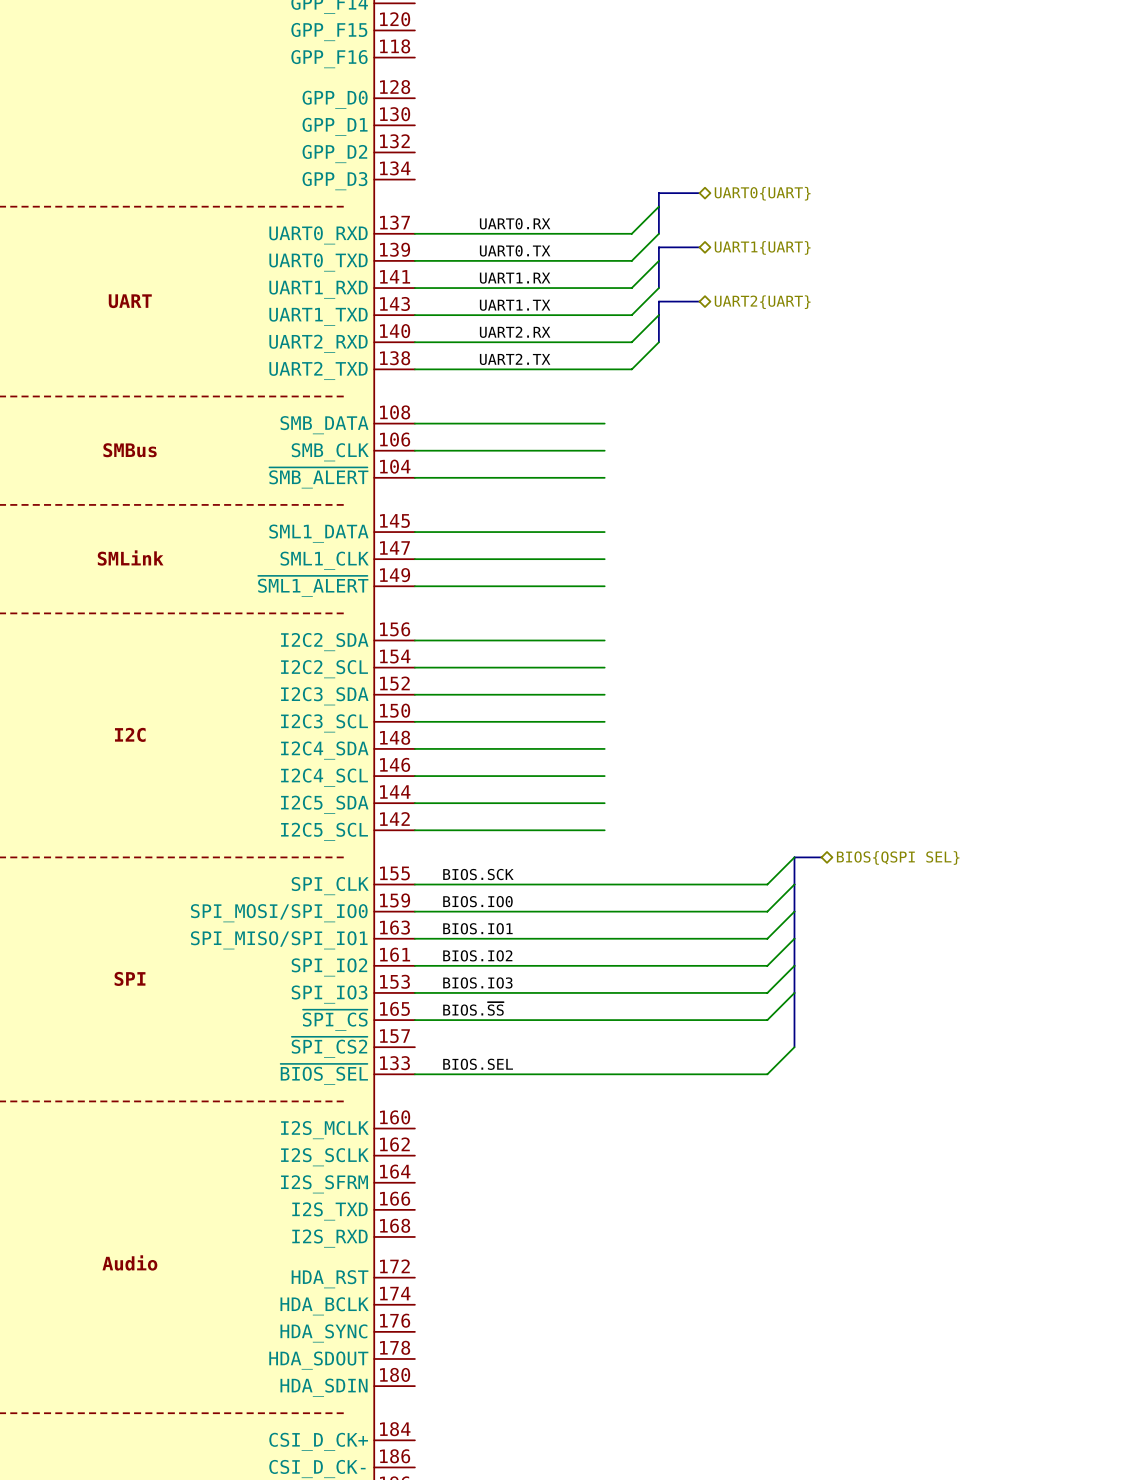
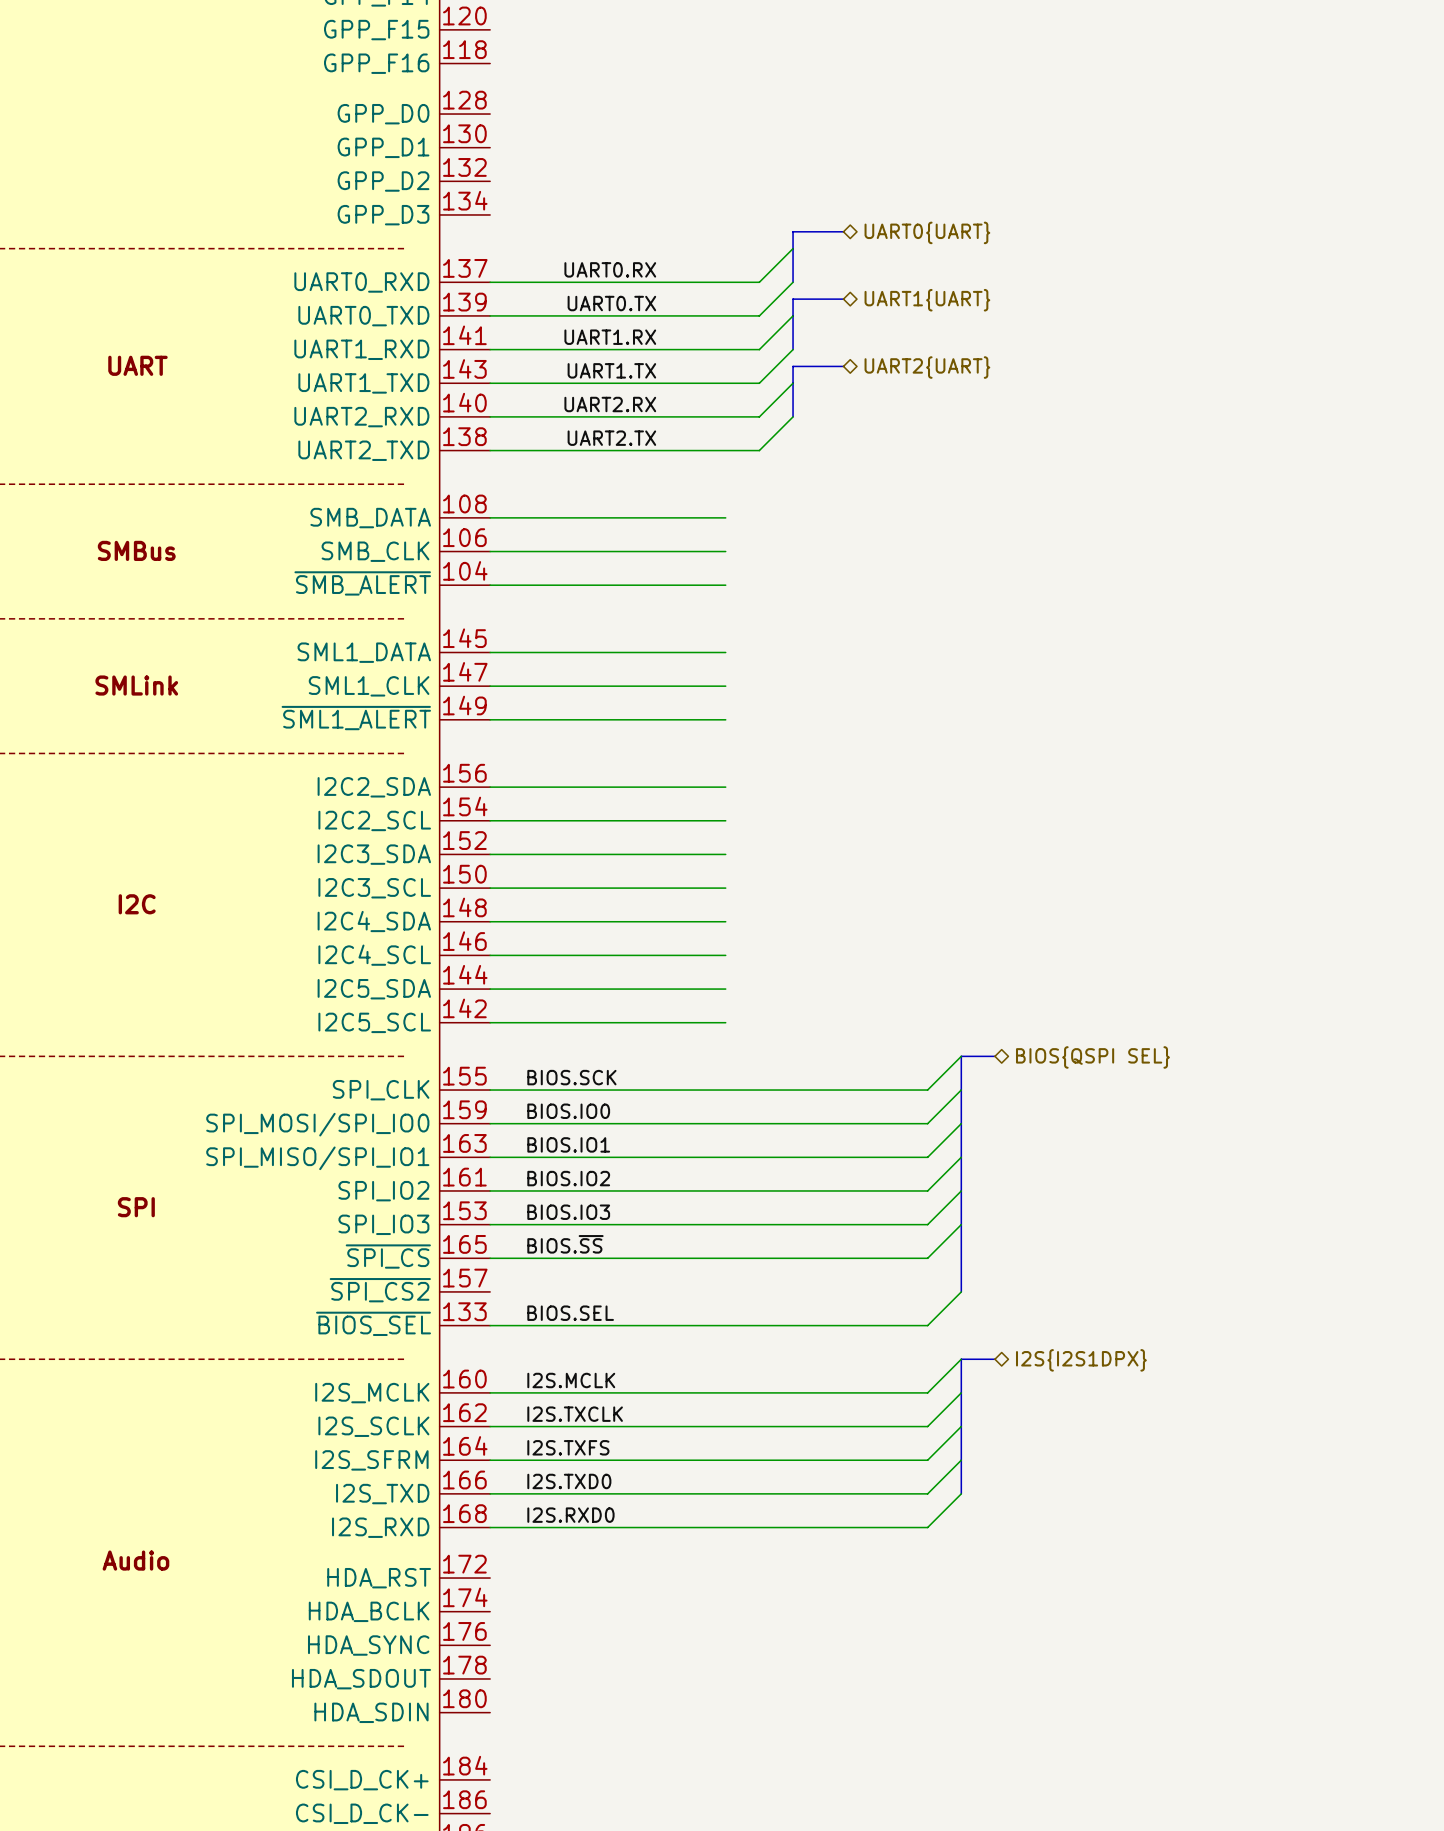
wire: none -> (961, 1359) (927, 1392) (490, 1392)
bus: none -> (994, 1359) (961, 1359) (961, 1493)
hierarchical label: none -> I2S{I2S1DPX} (1081, 1360)
label: none -> I2S.MCLK (571, 1380)
wire: none -> (961, 1392) (927, 1426) (490, 1426)
label: none -> I2S.TXCLK (575, 1414)
wire: none -> (961, 1426) (927, 1460) (490, 1460)
label: none -> I2S.TXFS (568, 1447)
wire: none -> (961, 1460) (927, 1493) (490, 1493)
label: none -> I2S.TXD0 (569, 1481)
wire: none -> (961, 1493) (927, 1527) (490, 1527)
label: none -> I2S.RXD0 (570, 1515)

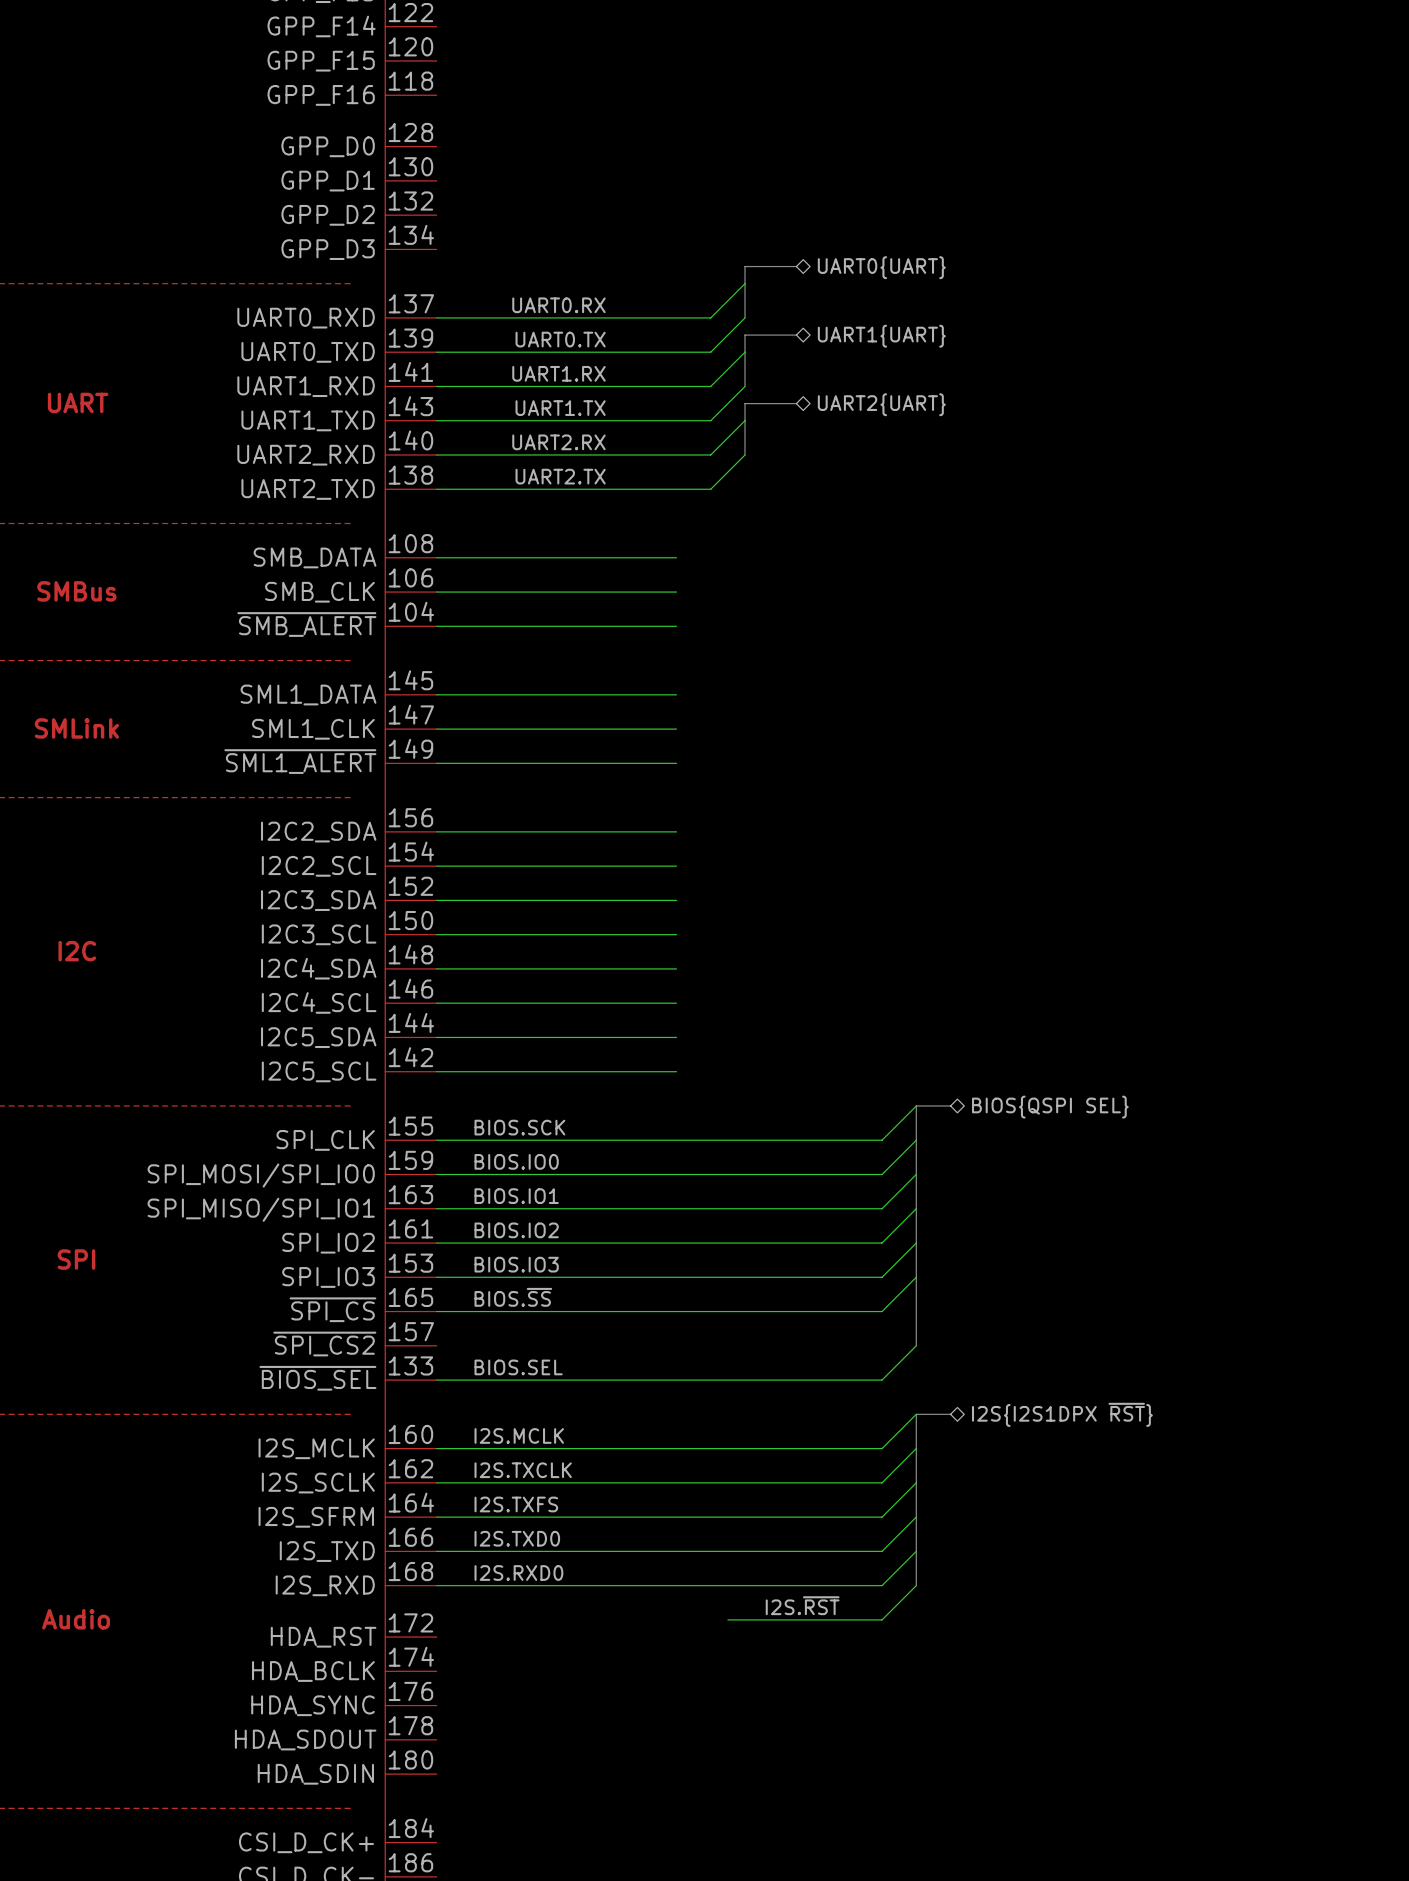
hierarchical label: I2S{I2S1DPX} (1081, 1360) -> I2S{I2S1DPX ~{RST}} (1062, 1414)
bus: none -> (916, 1551) (916, 1585)
wire: none -> (916, 1585) (882, 1619) (727, 1619)
label: none -> I2S.~{RST} (802, 1605)

